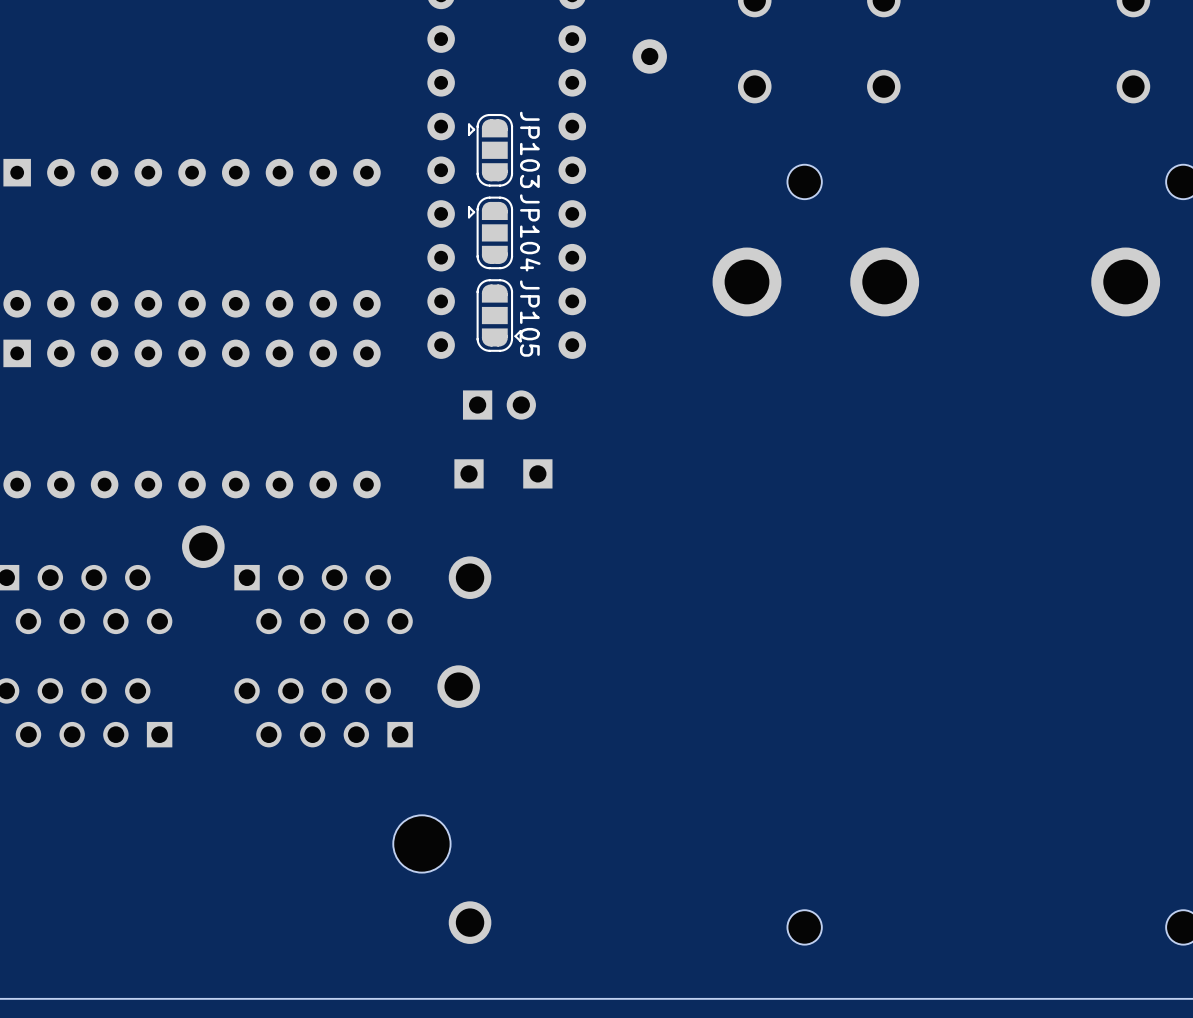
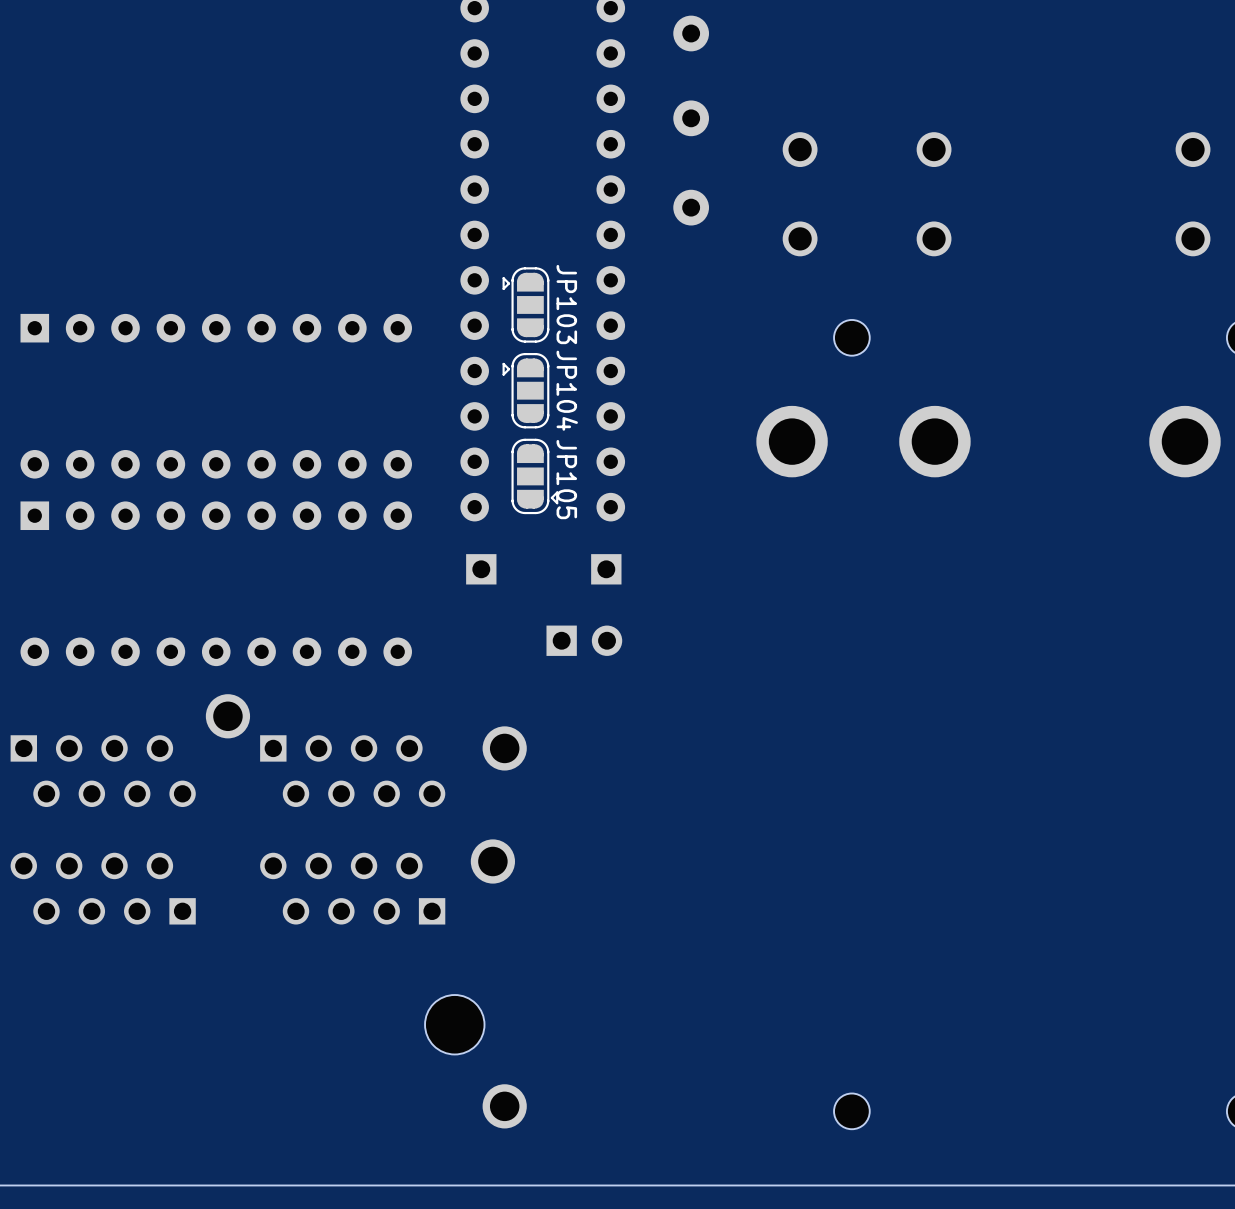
part: none -> (481, 569)
part: (499, 405) -> none
part: none -> (606, 569)
part footprint: [523, 459, 553, 489] -> [546, 625, 623, 656]
part: (469, 473) -> none

